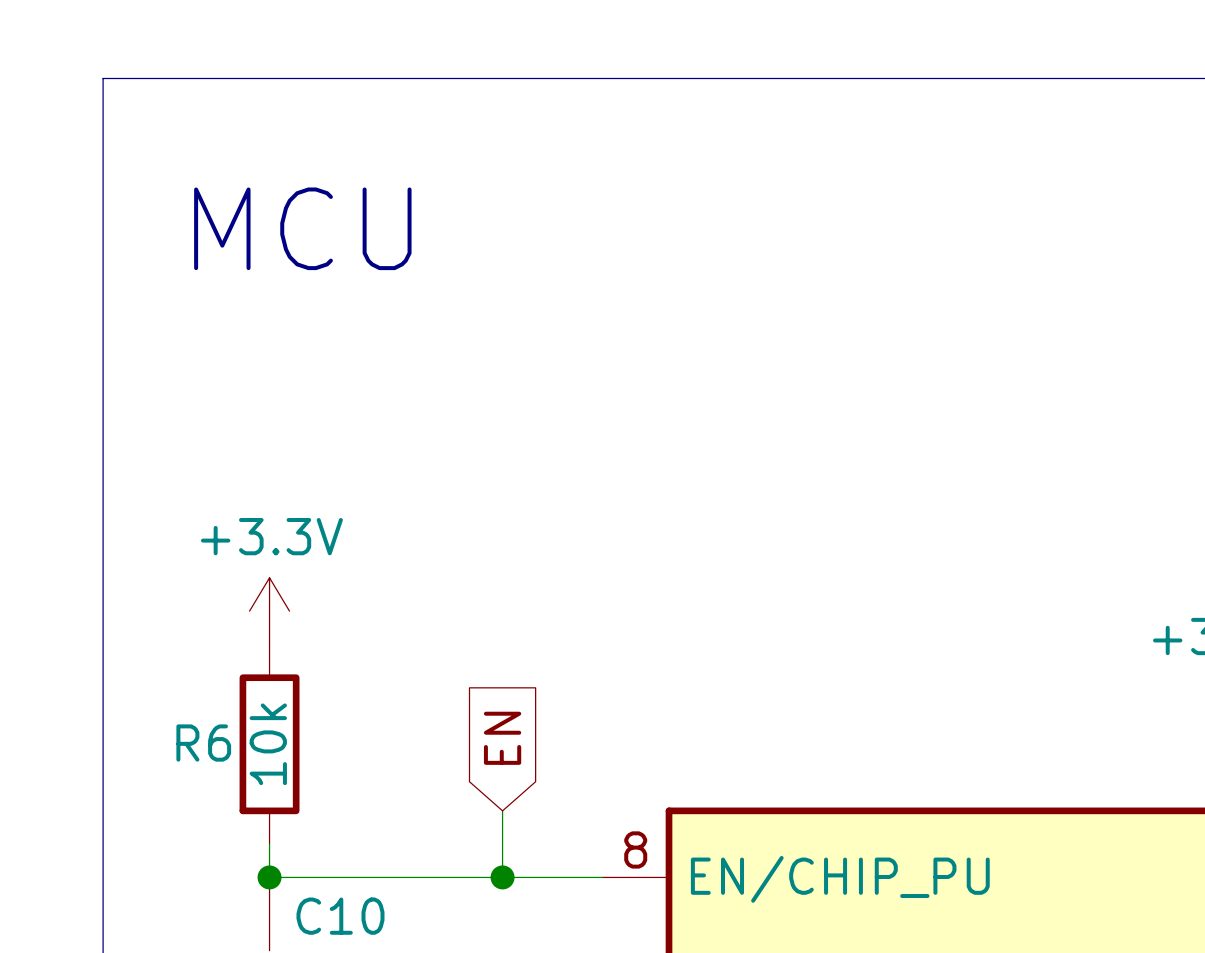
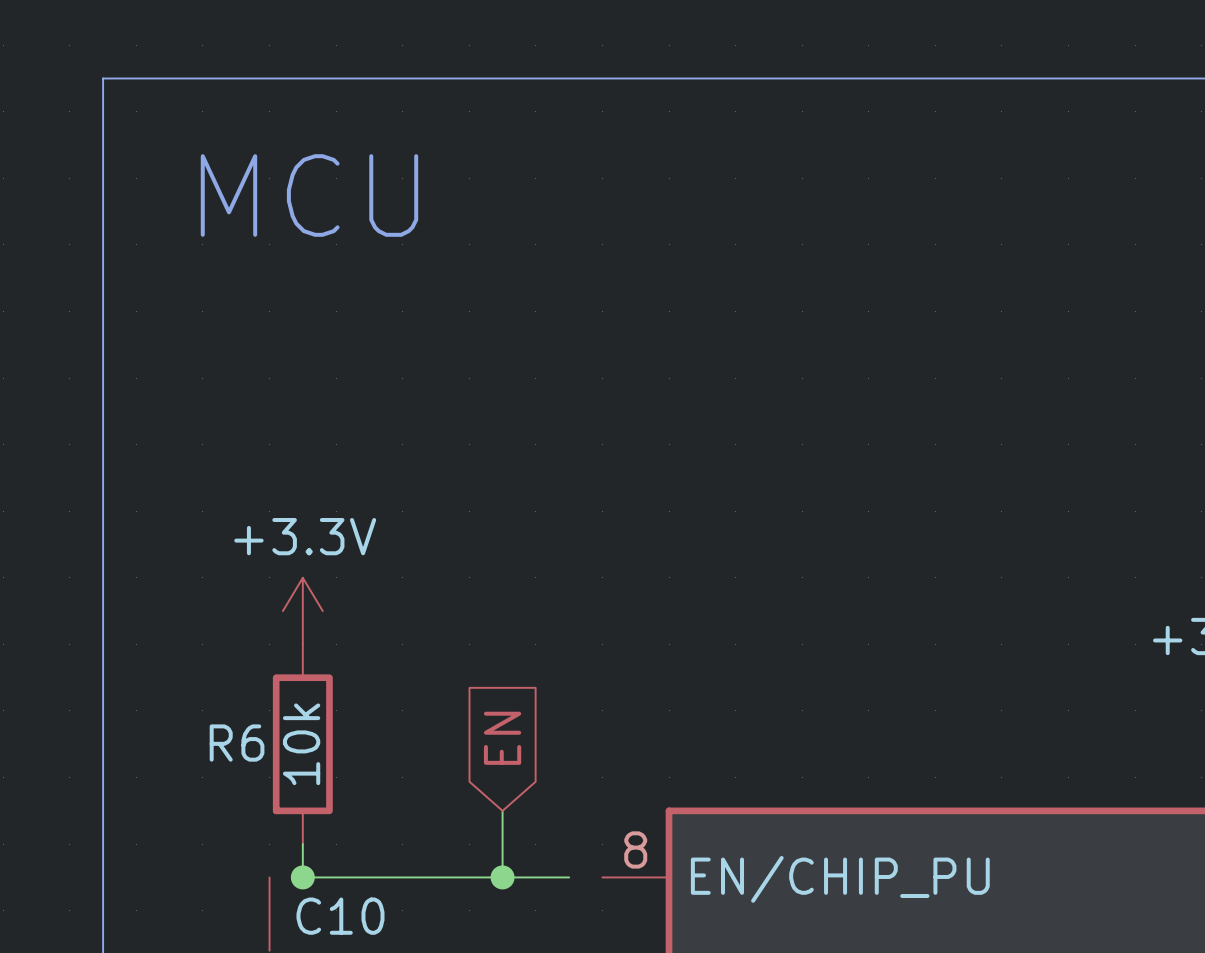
text position: MCU (302, 228) -> MCU (309, 195)
power symbol position: +3.3V (269, 611) -> +3.3V (302, 611)
R6 position: (269, 744) -> (302, 744)
wire: (269, 844) (269, 877) (302, 877) -> (302, 844) (302, 877)
junction position: (269, 877) -> (302, 877)
wire: (569, 877) (602, 877) -> none

